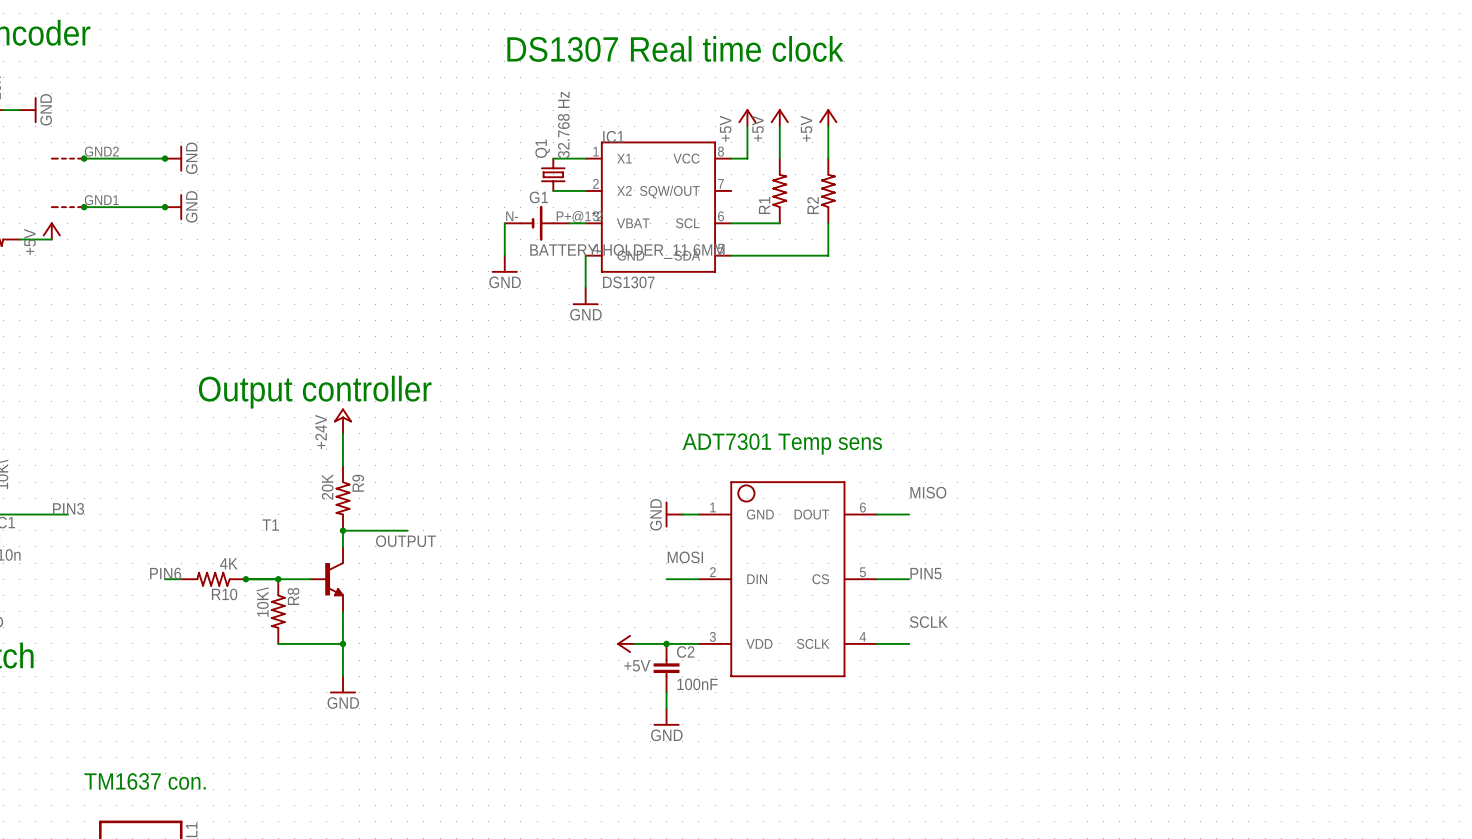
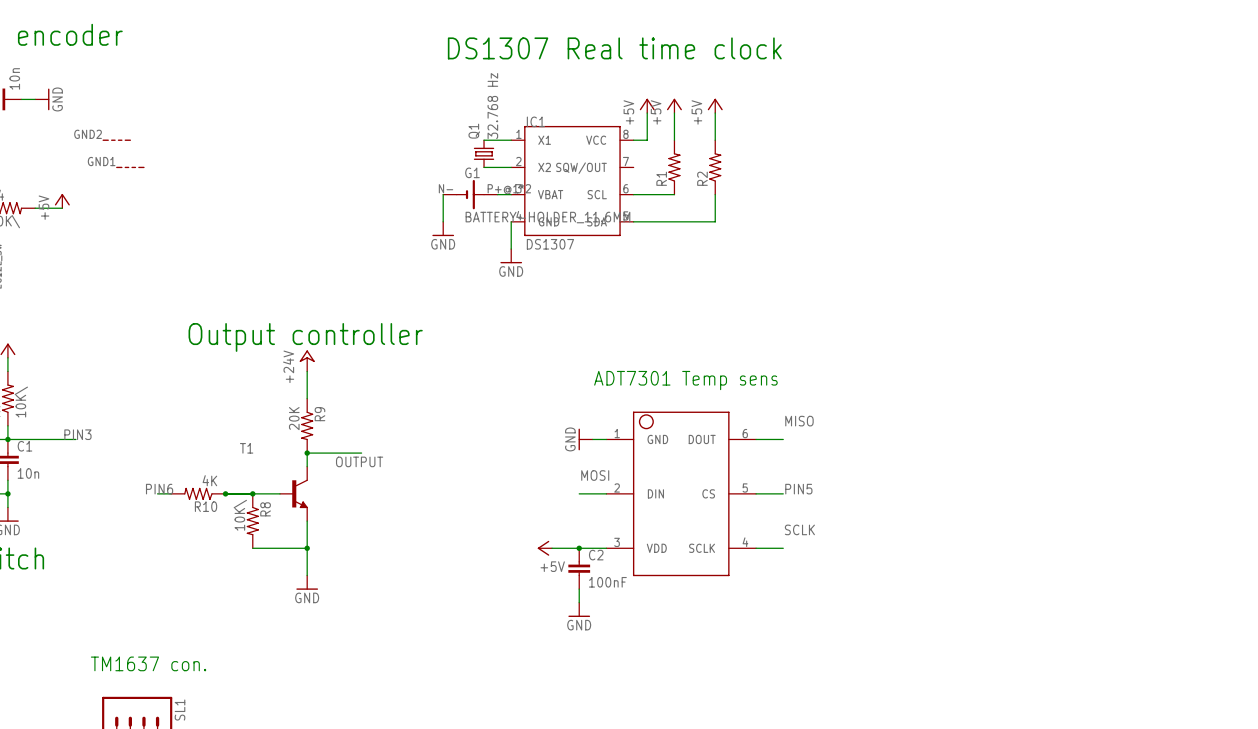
part rotation: 0° (67, 158) -> 180° (116, 140)
part position: (67, 158) -> (116, 140)
wire: (84, 158) (165, 158) -> none
junction: (84, 158) -> none
junction: (165, 158) -> none
power symbol: GND (173, 158) -> none
part rotation: 0° (67, 207) -> 180° (130, 167)
part position: (67, 207) -> (130, 167)
wire: (84, 207) (165, 207) -> none
junction: (84, 207) -> none
junction: (165, 207) -> none
power symbol: GND (173, 207) -> none

